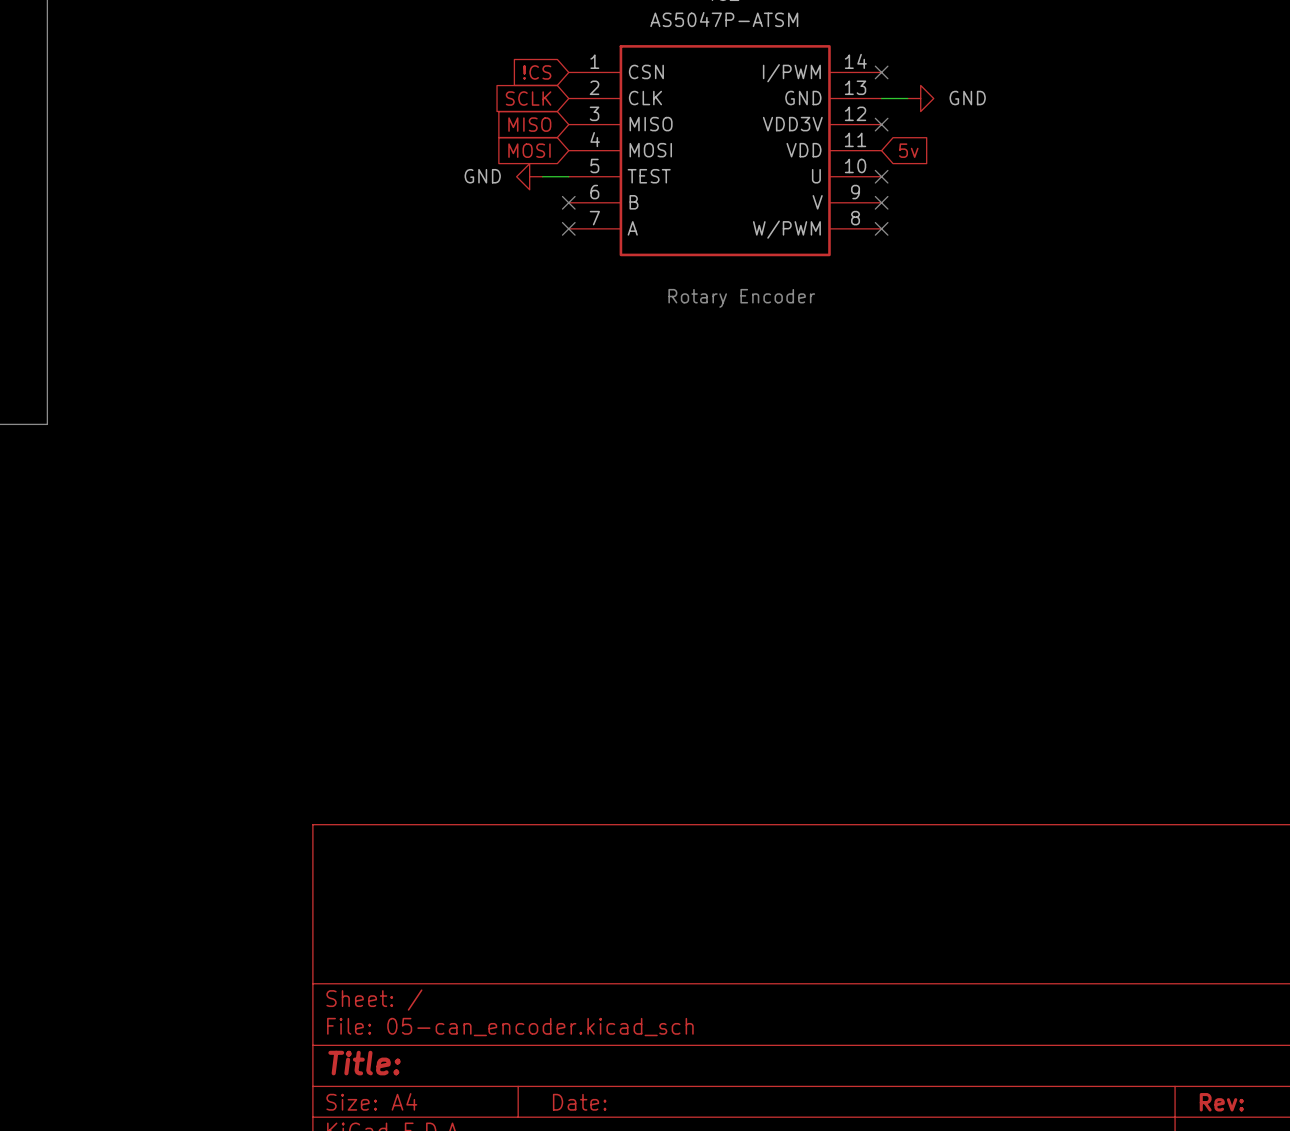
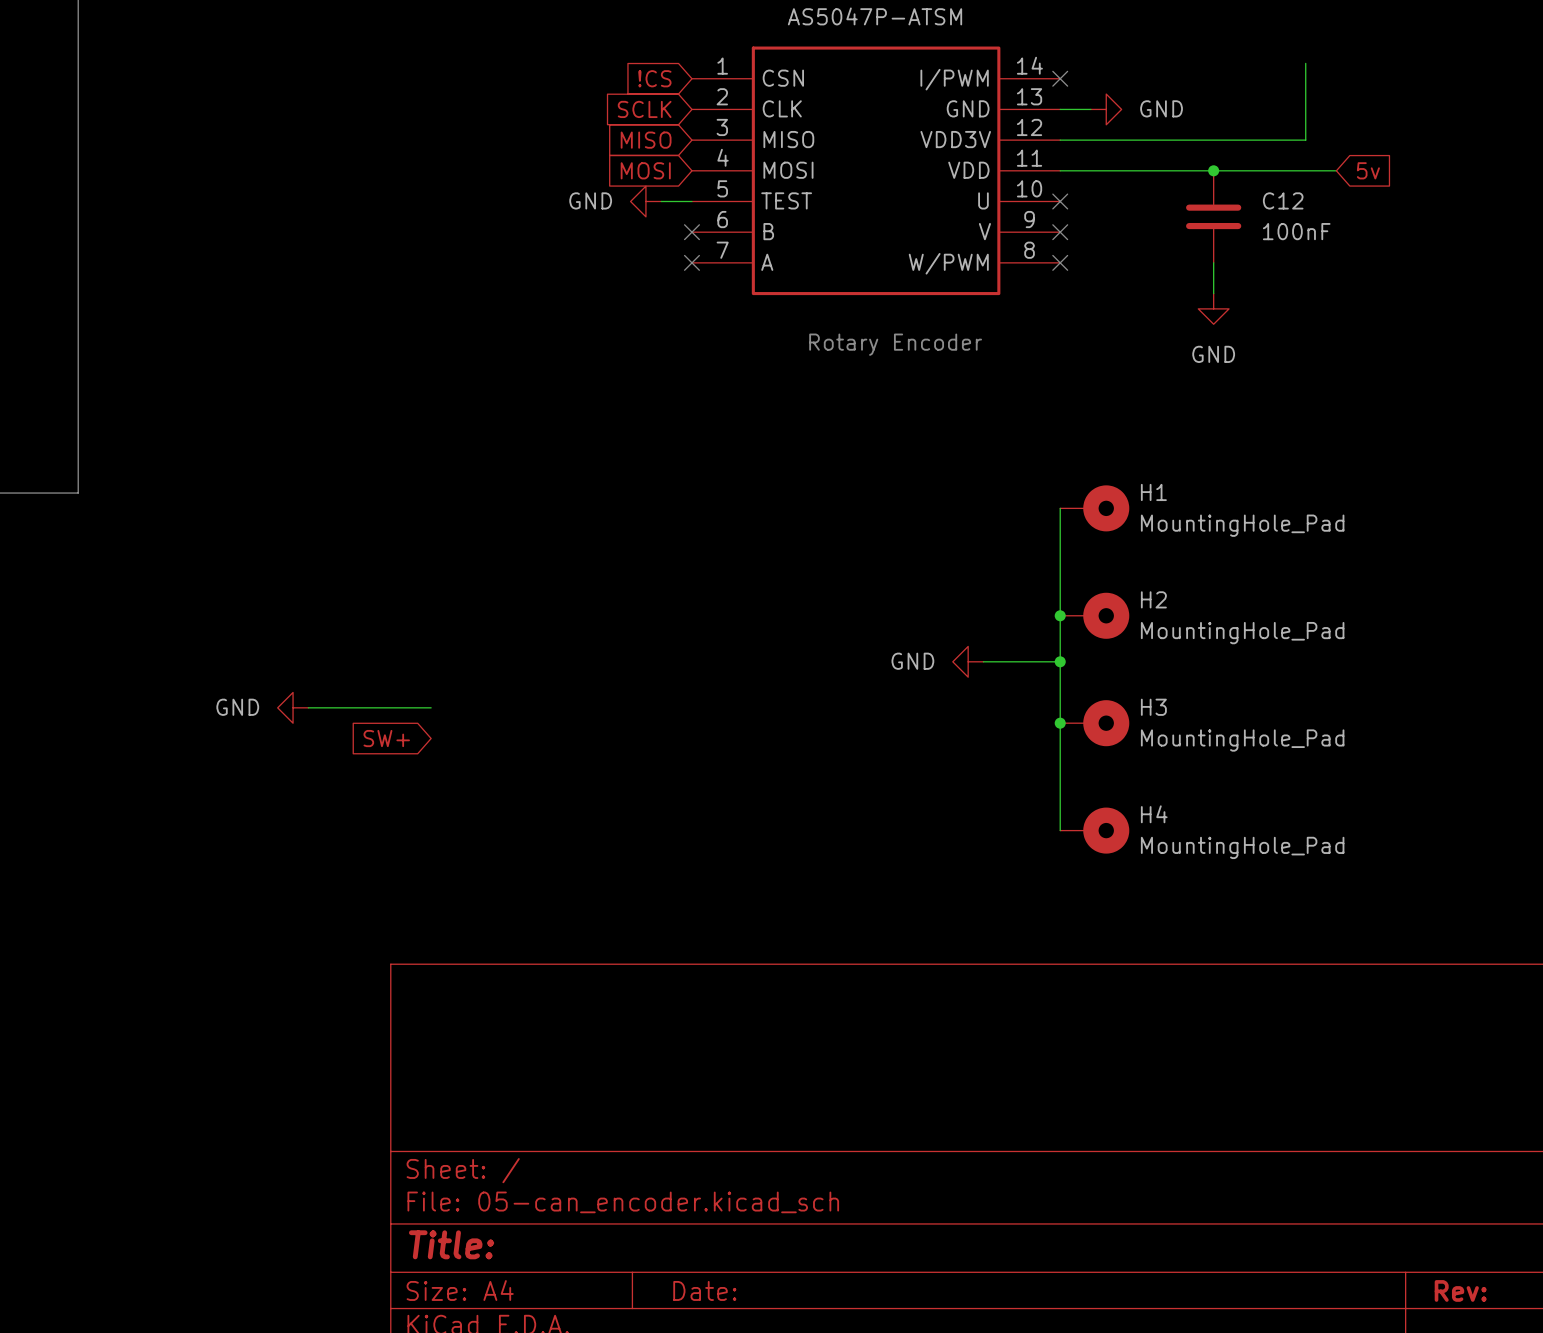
wire: none -> (1305, 63) (1305, 140) (1060, 140)
no-connect mark: (881, 124) -> none
wire: none -> (1060, 170) (1336, 170)
global label position: 5v (908, 150) -> 5v (1368, 170)
junction: none -> (1213, 170)
C12: none -> 100nF (1213, 216)
wire: none -> (1213, 262) (1213, 293)
power symbol: none -> GND (1213, 308)
wire: none -> (1060, 508) (1060, 830)
H1: none -> MountingHole_Pad (1094, 508)
junction: none -> (1060, 615)
H2: none -> MountingHole_Pad (1094, 615)
power symbol: none -> GND (968, 661)
wire: none -> (983, 661) (1060, 661)
junction: none -> (1060, 661)
power symbol: none -> GND (293, 707)
wire: none -> (308, 707) (431, 707)
junction: none -> (1060, 723)
H3: none -> MountingHole_Pad (1094, 723)
global label: none -> SW+ (386, 738)
H4: none -> MountingHole_Pad (1094, 830)

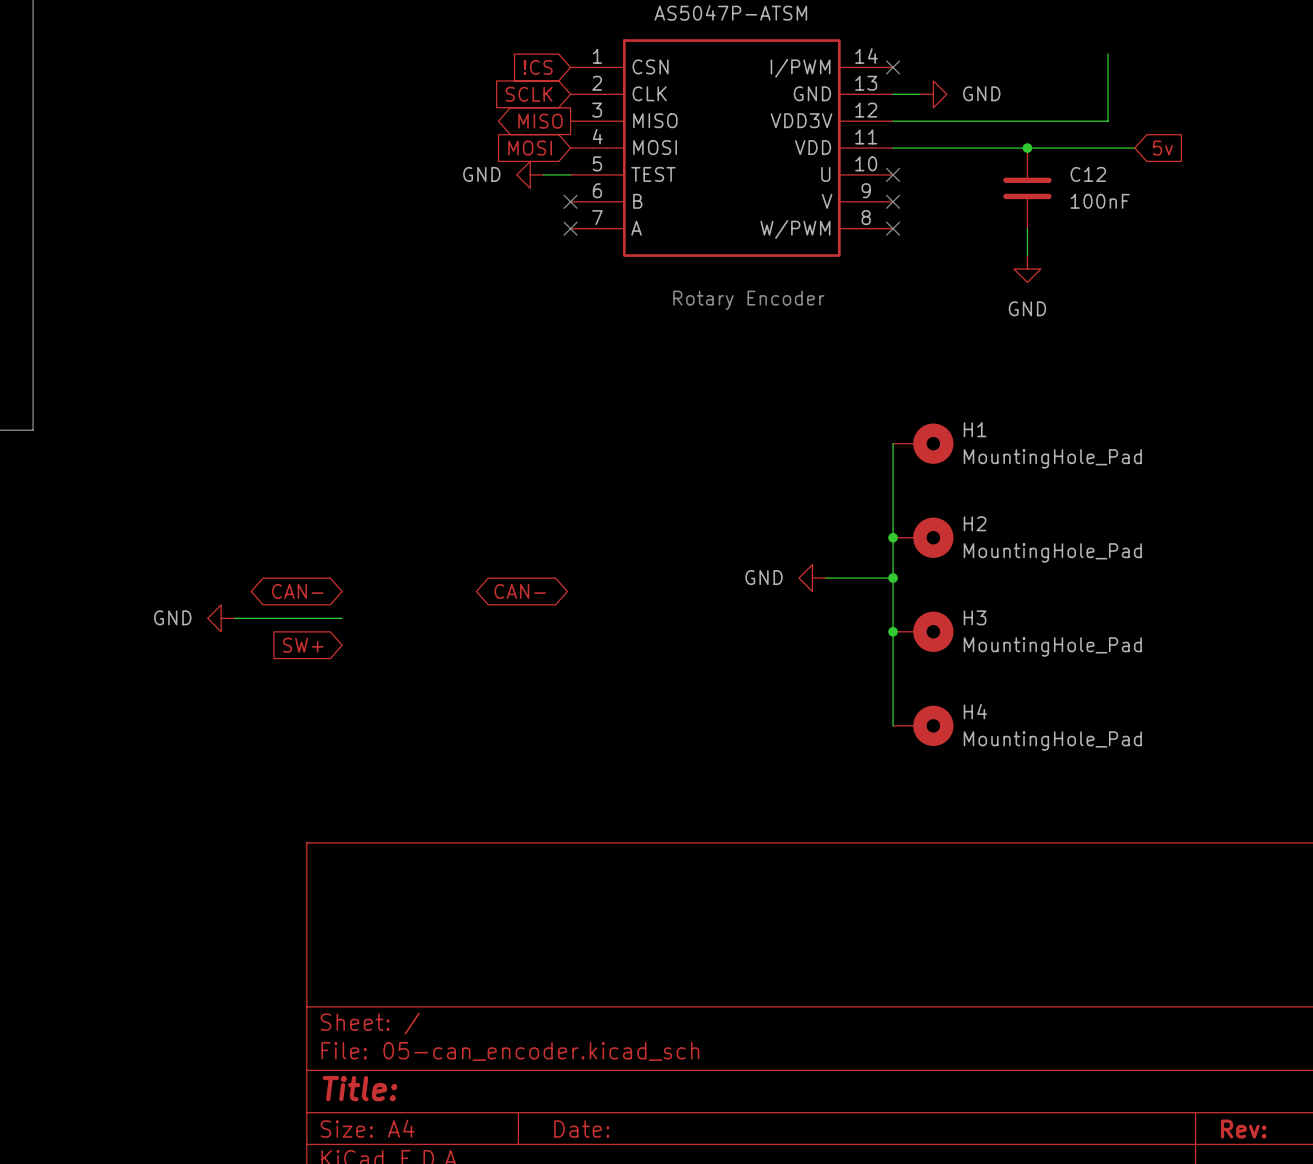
global label shape: input (646, 140) -> output (540, 121)
global label: none -> CAN- (297, 591)
global label: none -> CAN- (520, 591)

